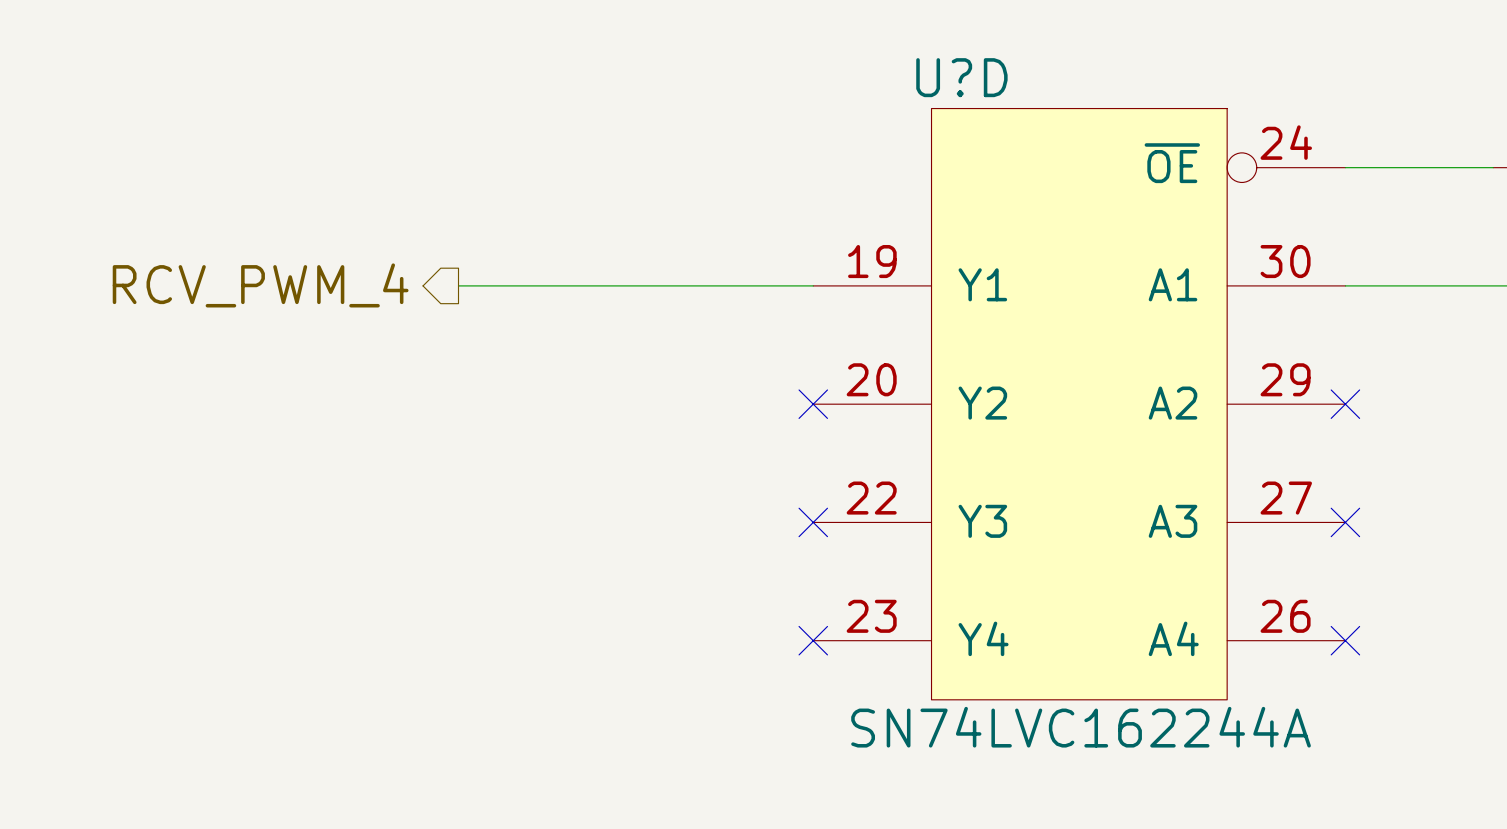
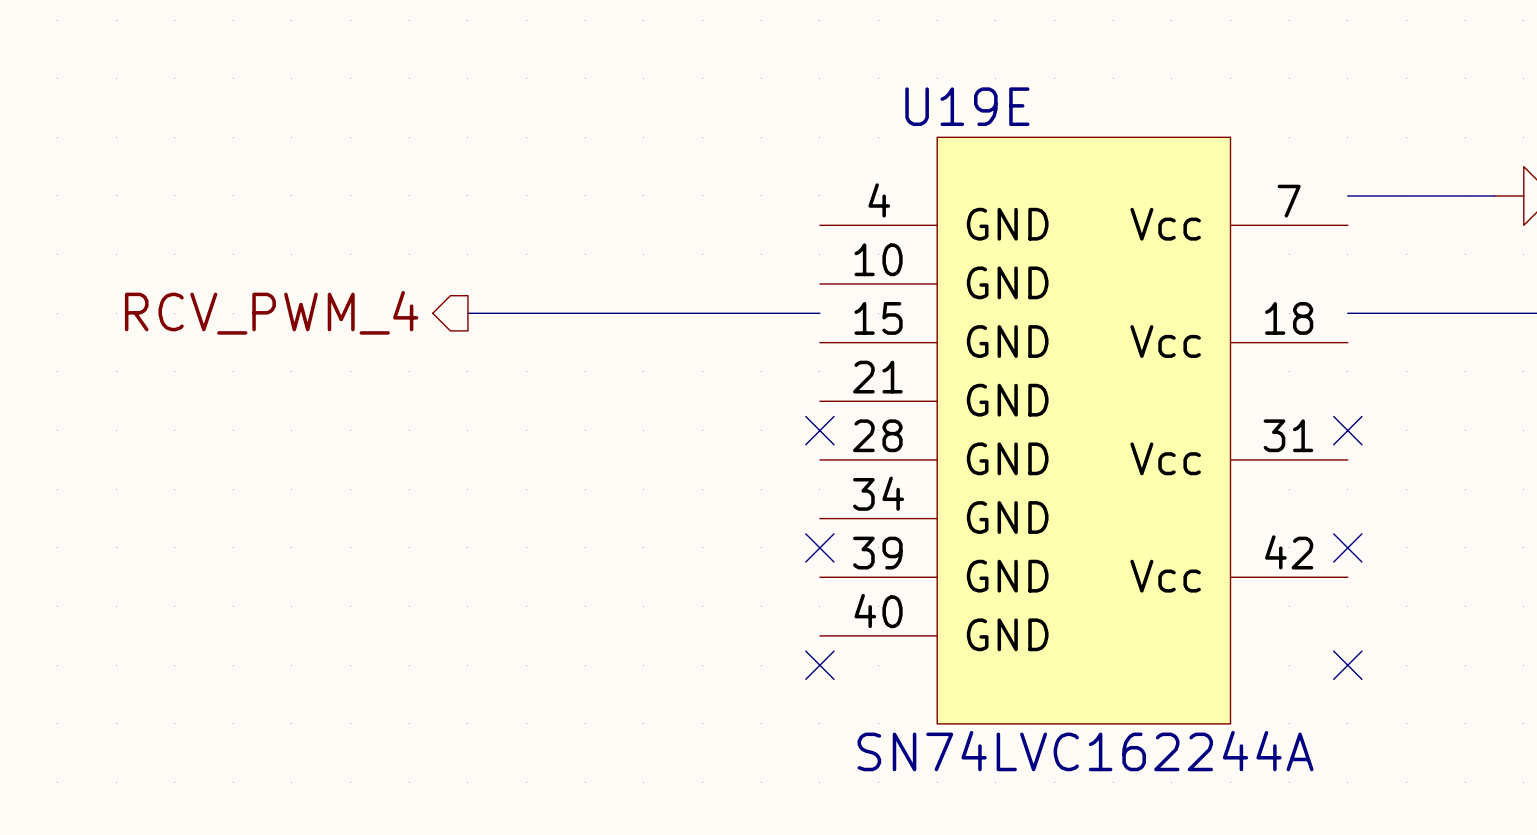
U?D: SN74LVC162244A (1079, 404) -> none
U19E: none -> SN74LVC162244A (1083, 430)

